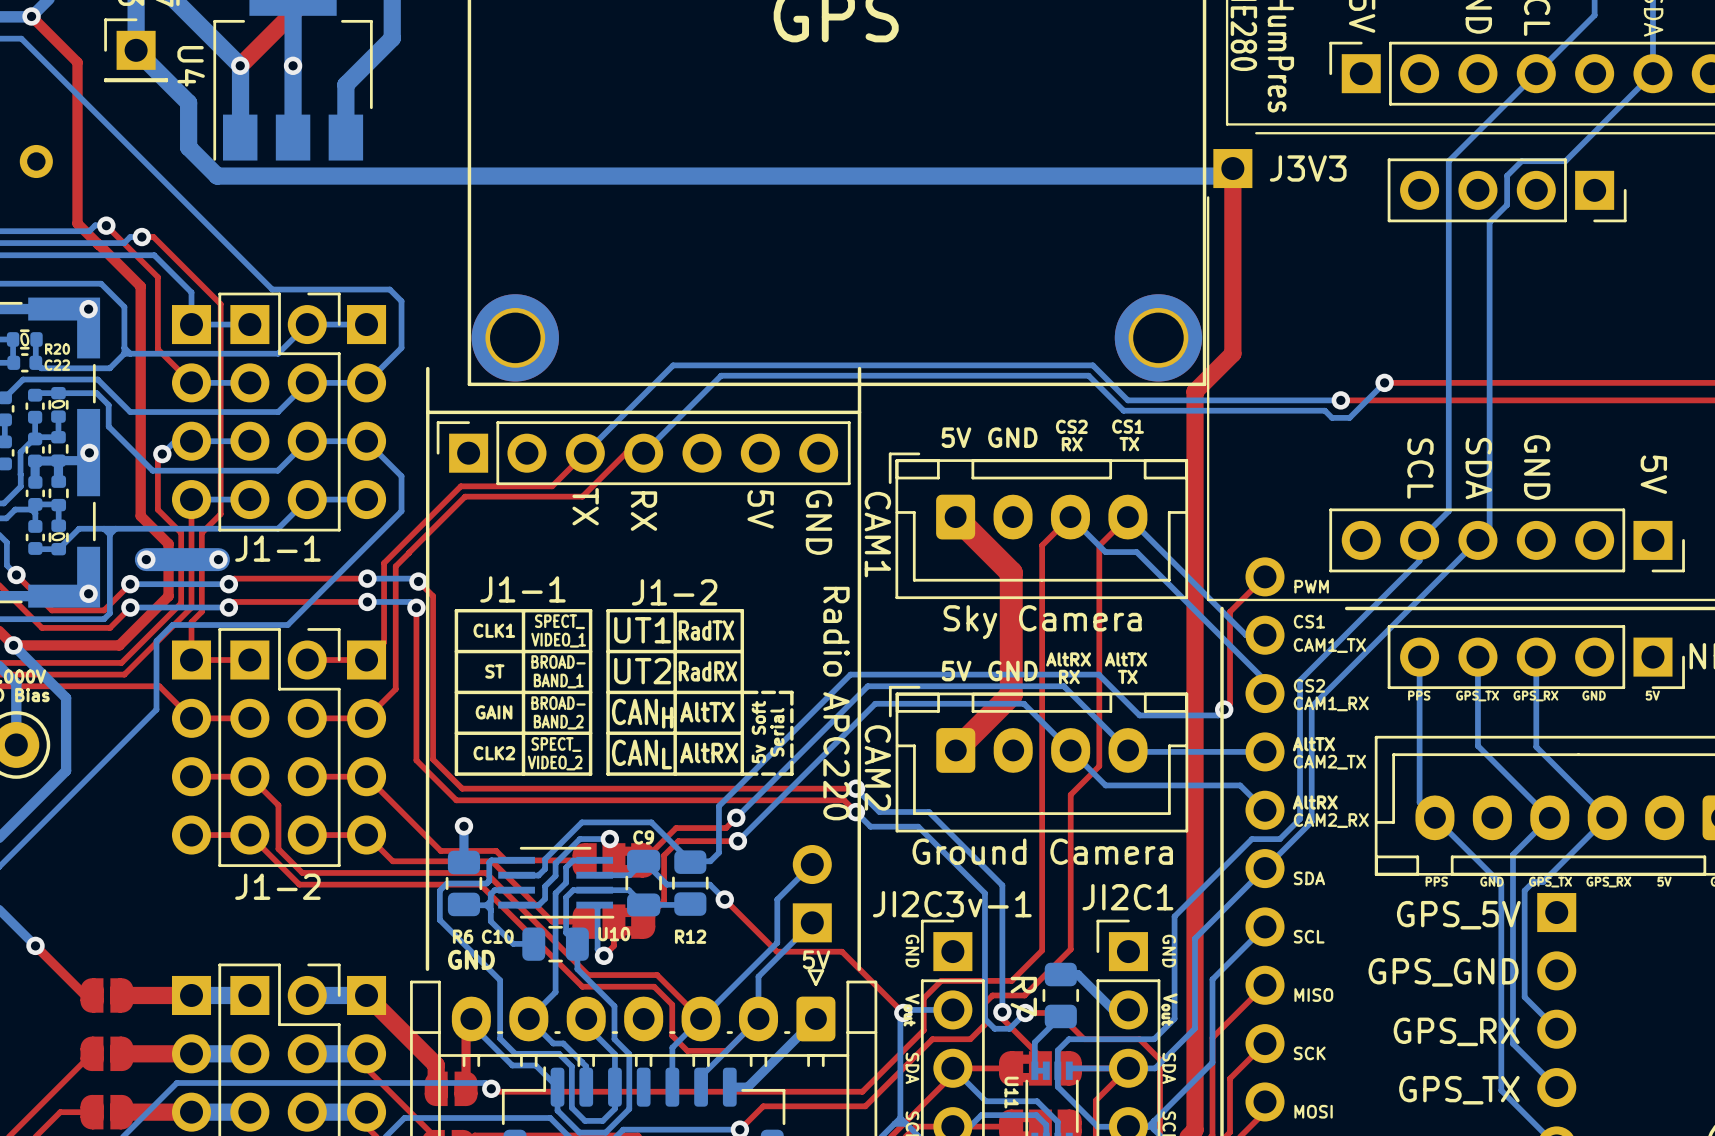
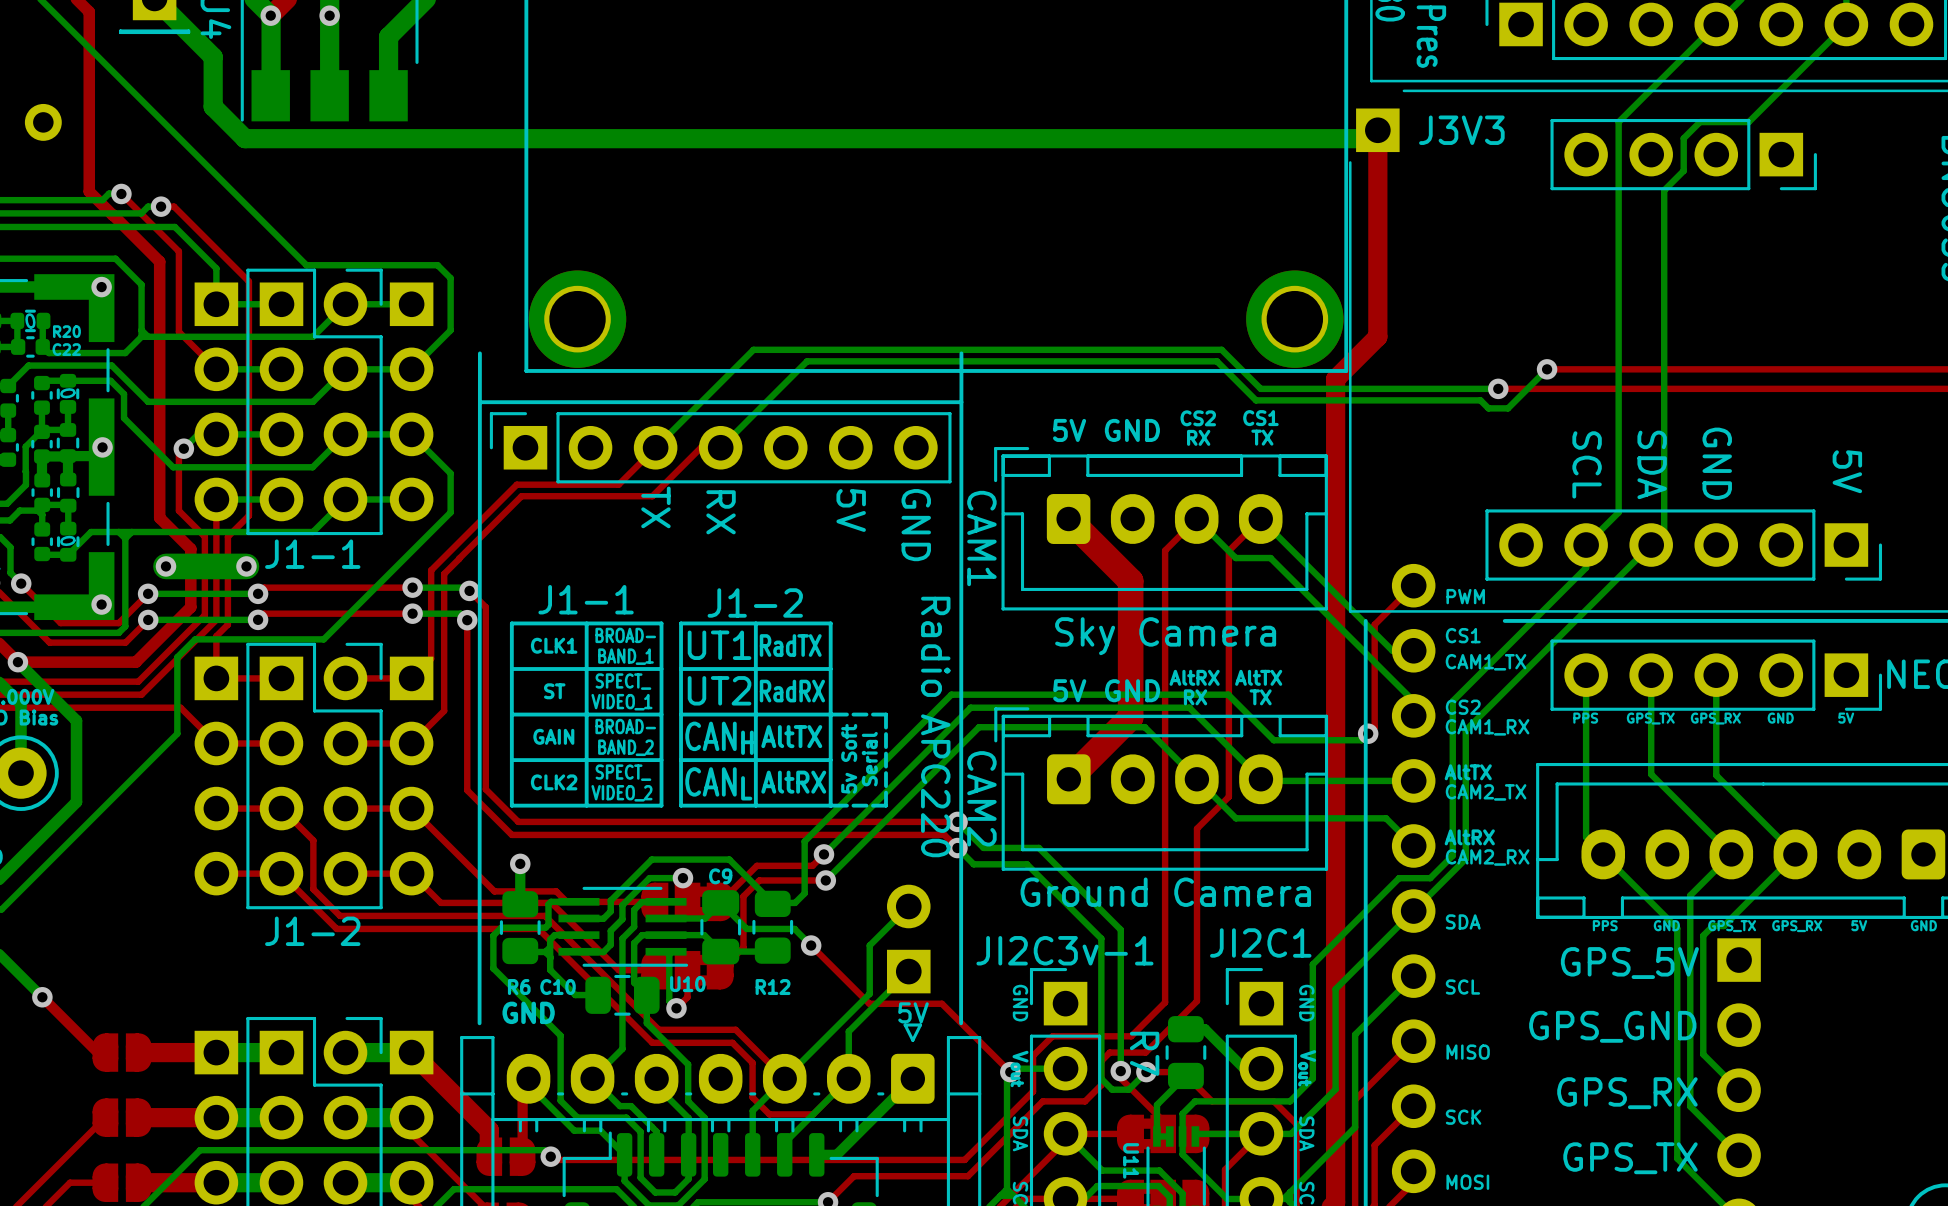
text: SPECT_ (559, 621) -> BROAD- (625, 635)
text: VIDEO_1 (558, 640) -> BAND_1 (625, 656)
text: BROAD- (558, 662) -> SPECT_ (623, 681)
text: BAND_1 (558, 681) -> VIDEO_1 (621, 702)

